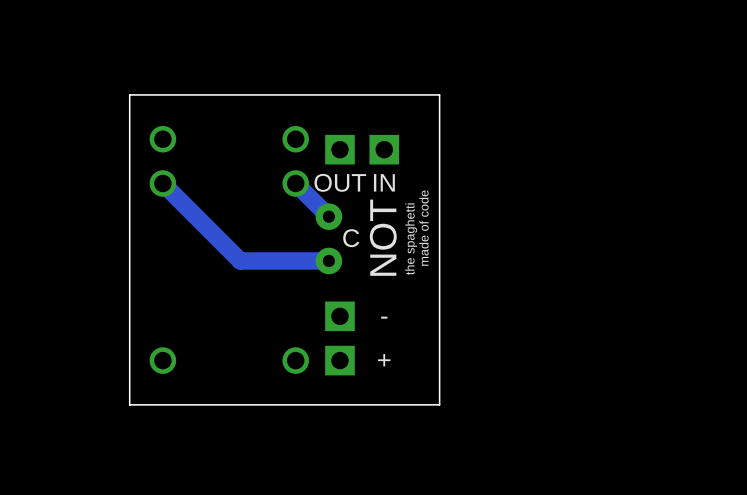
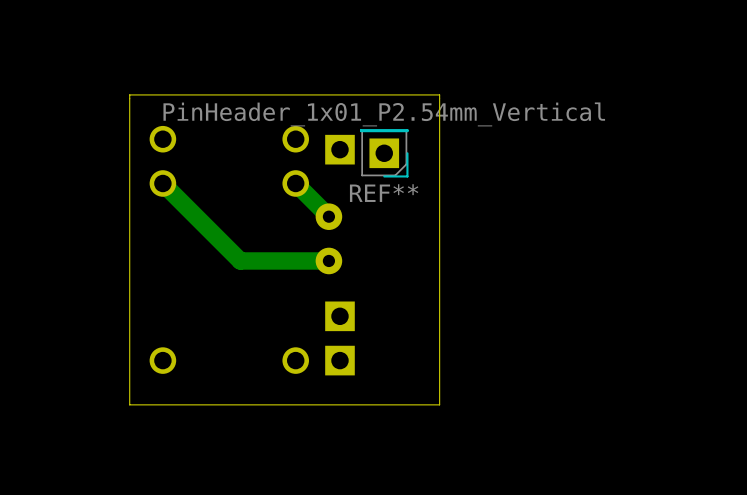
REF** side: top (384, 149) -> bottom (384, 153)
text: OUT (340, 182) -> none
text: IN (384, 182) -> none
text: made of code (423, 228) -> none
text: NOT (383, 237) -> none
text: C (351, 238) -> none
text: the spaghetti (411, 239) -> none
text: - (384, 317) -> none
text: + (384, 360) -> none

